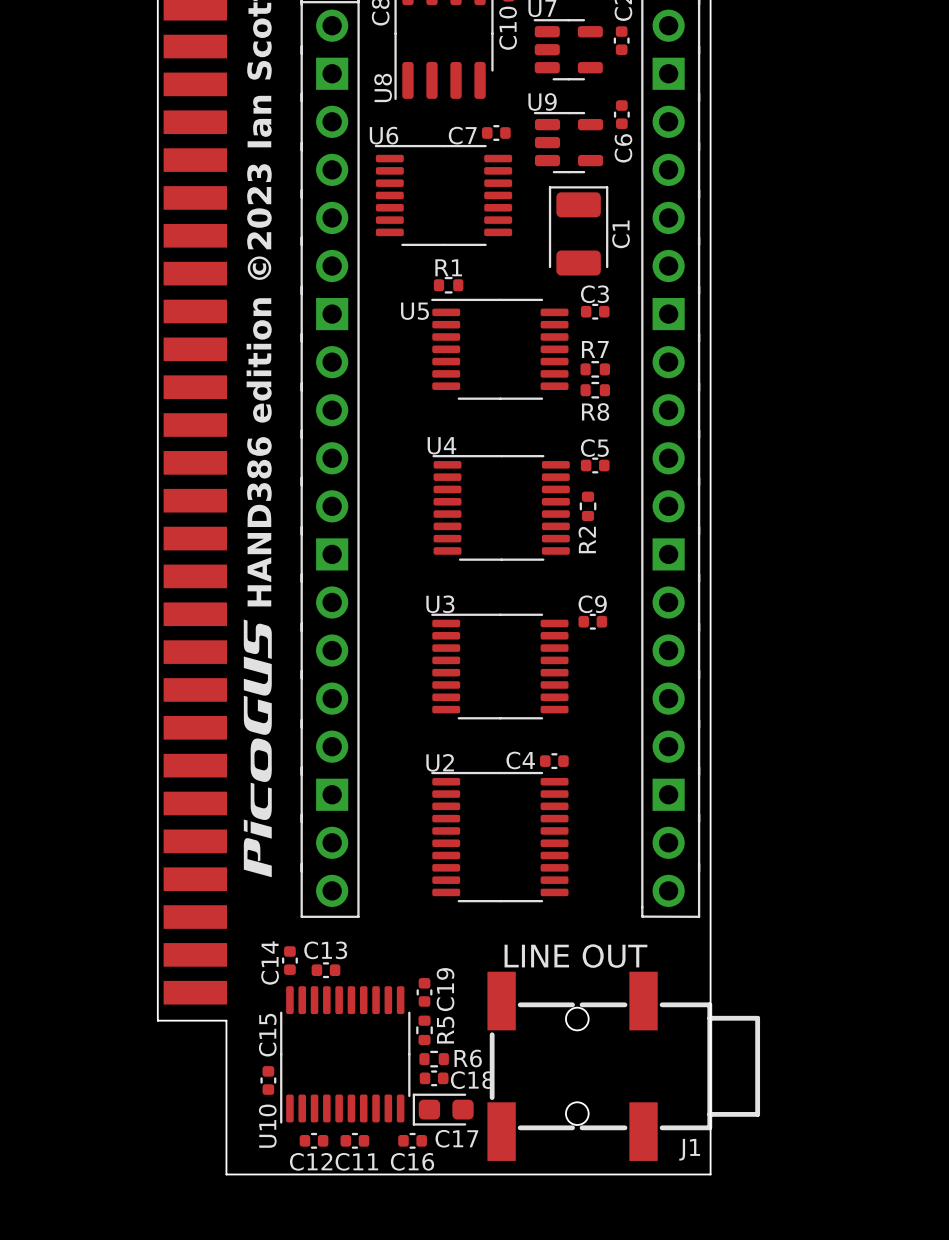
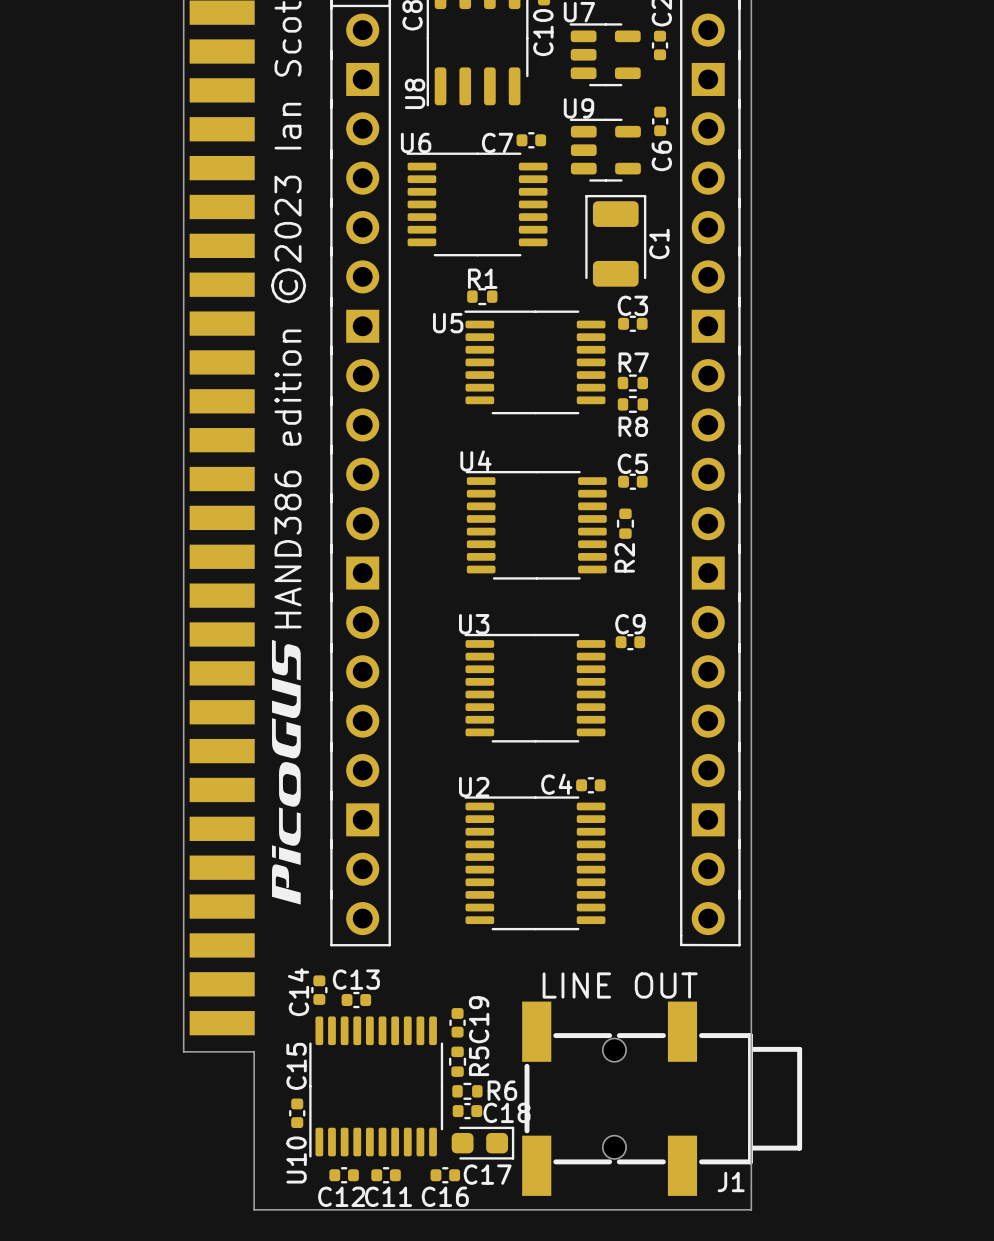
C17 rotation: 0° (443, 1109) -> 180° (482, 1143)

